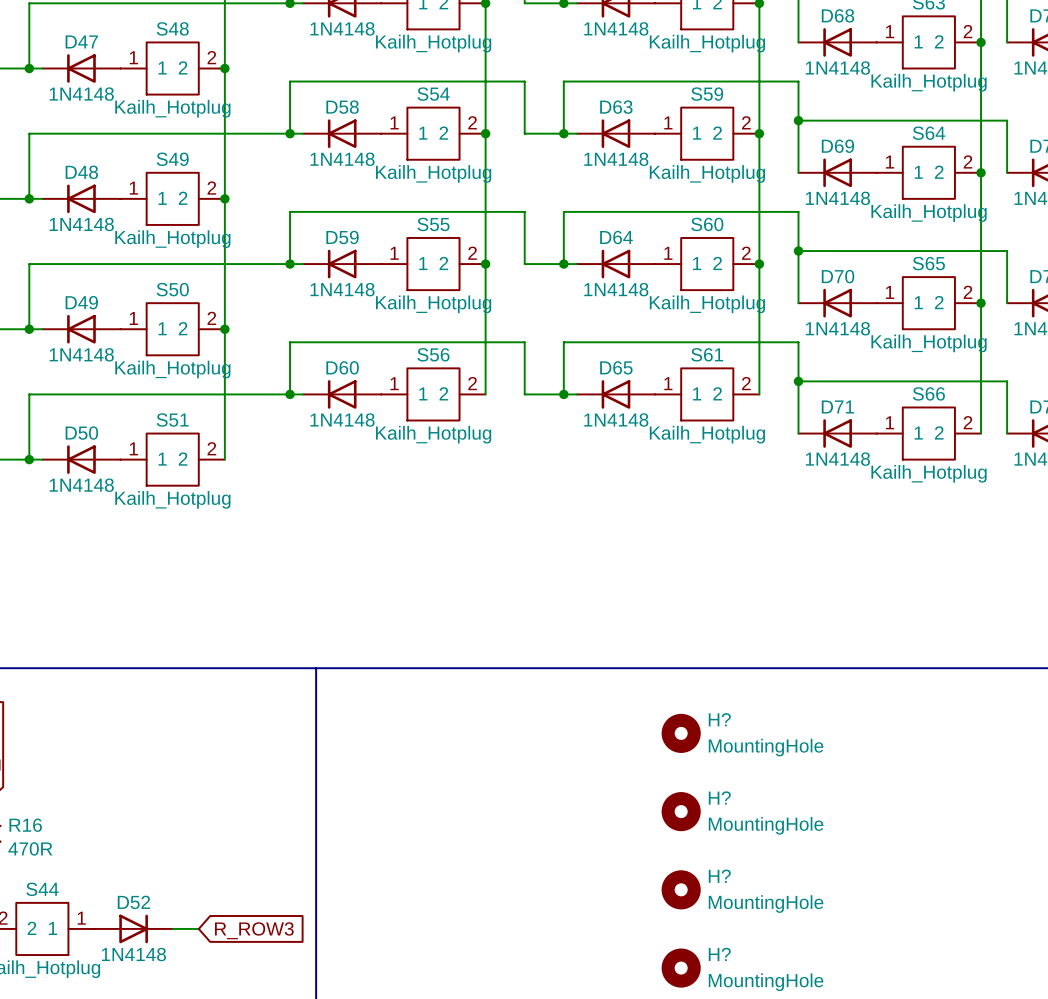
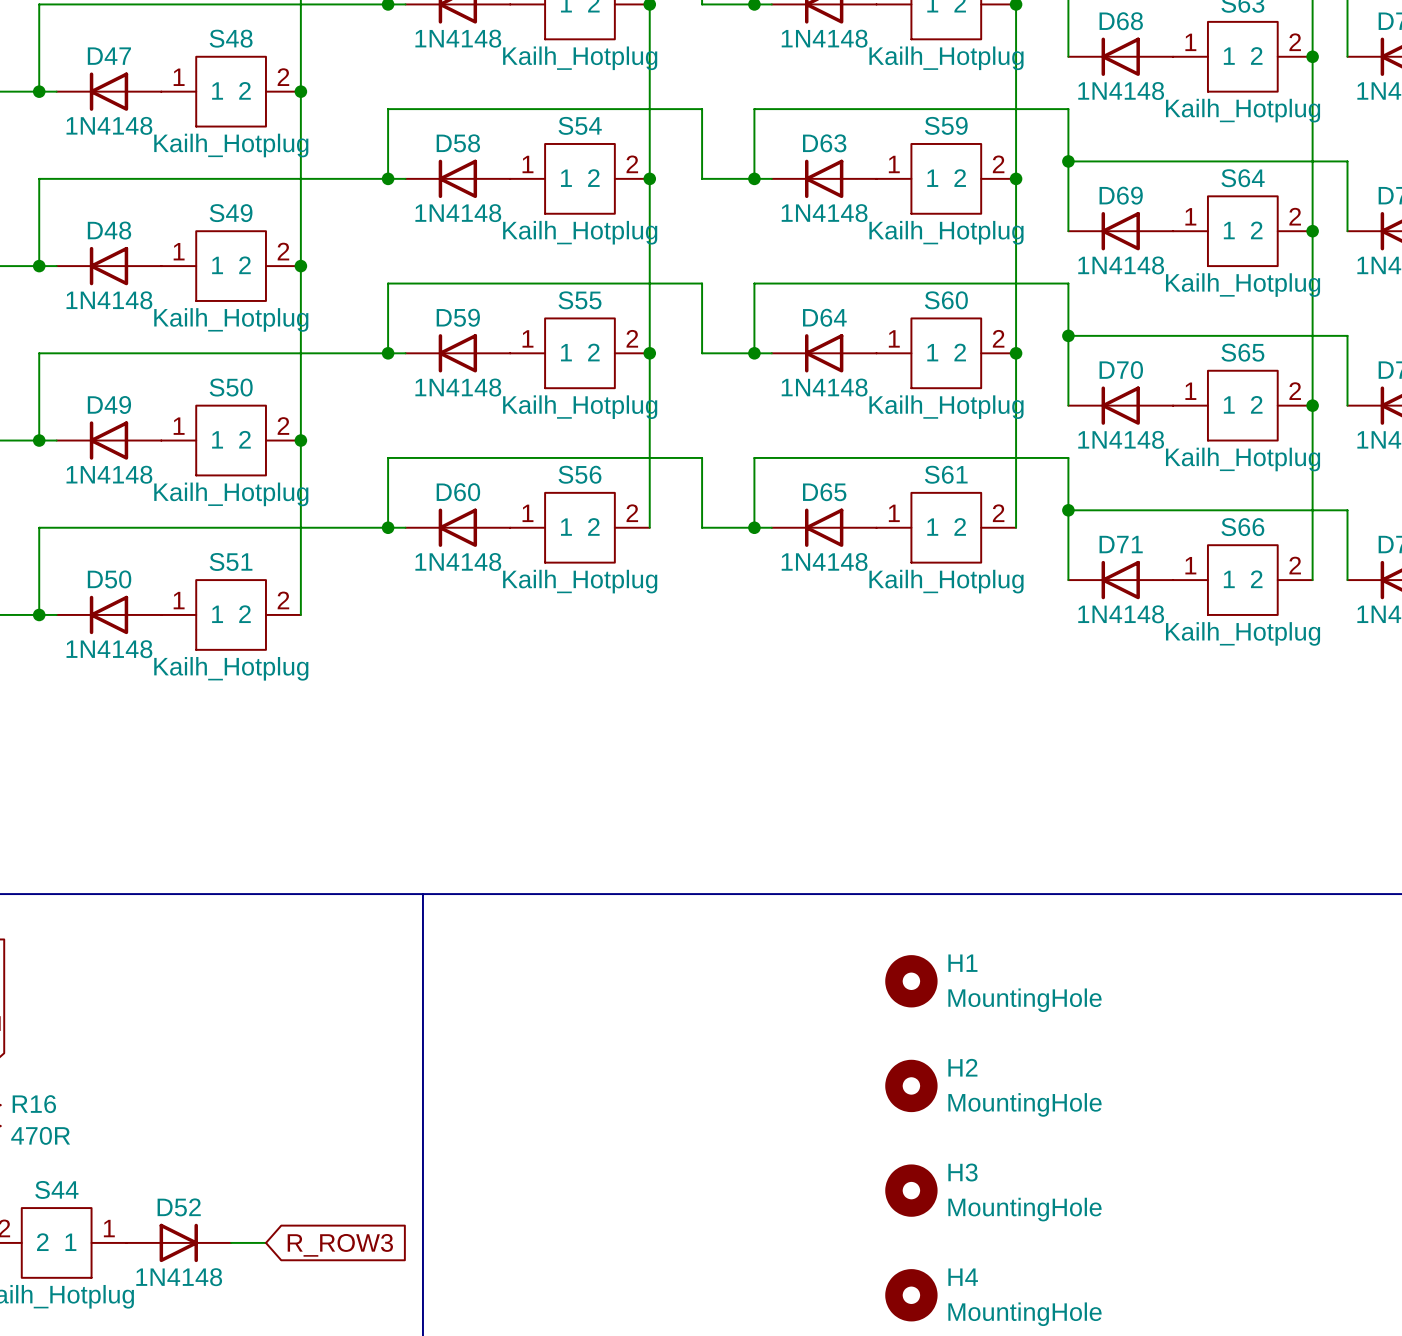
H? name: H? (719, 719) -> H1 (962, 963)
H? name: H? (719, 797) -> H2 (962, 1067)
H? name: H? (719, 876) -> H3 (962, 1172)
H? name: H? (719, 954) -> H4 (963, 1277)

